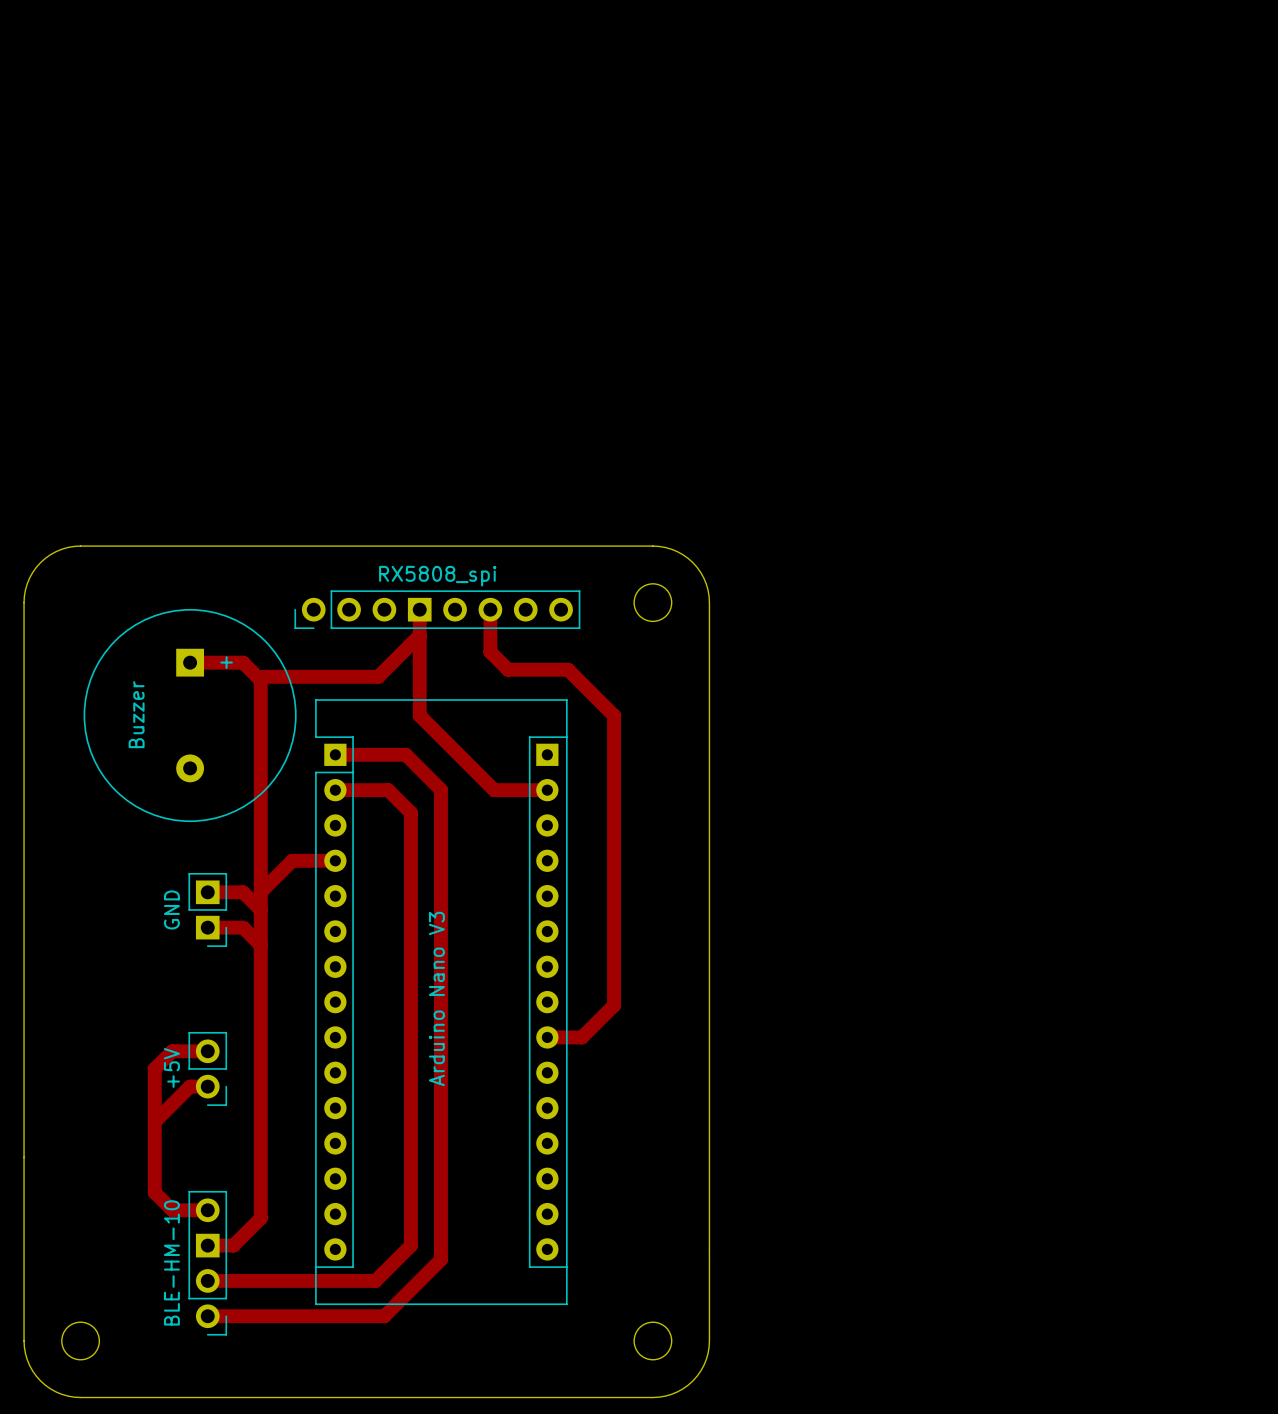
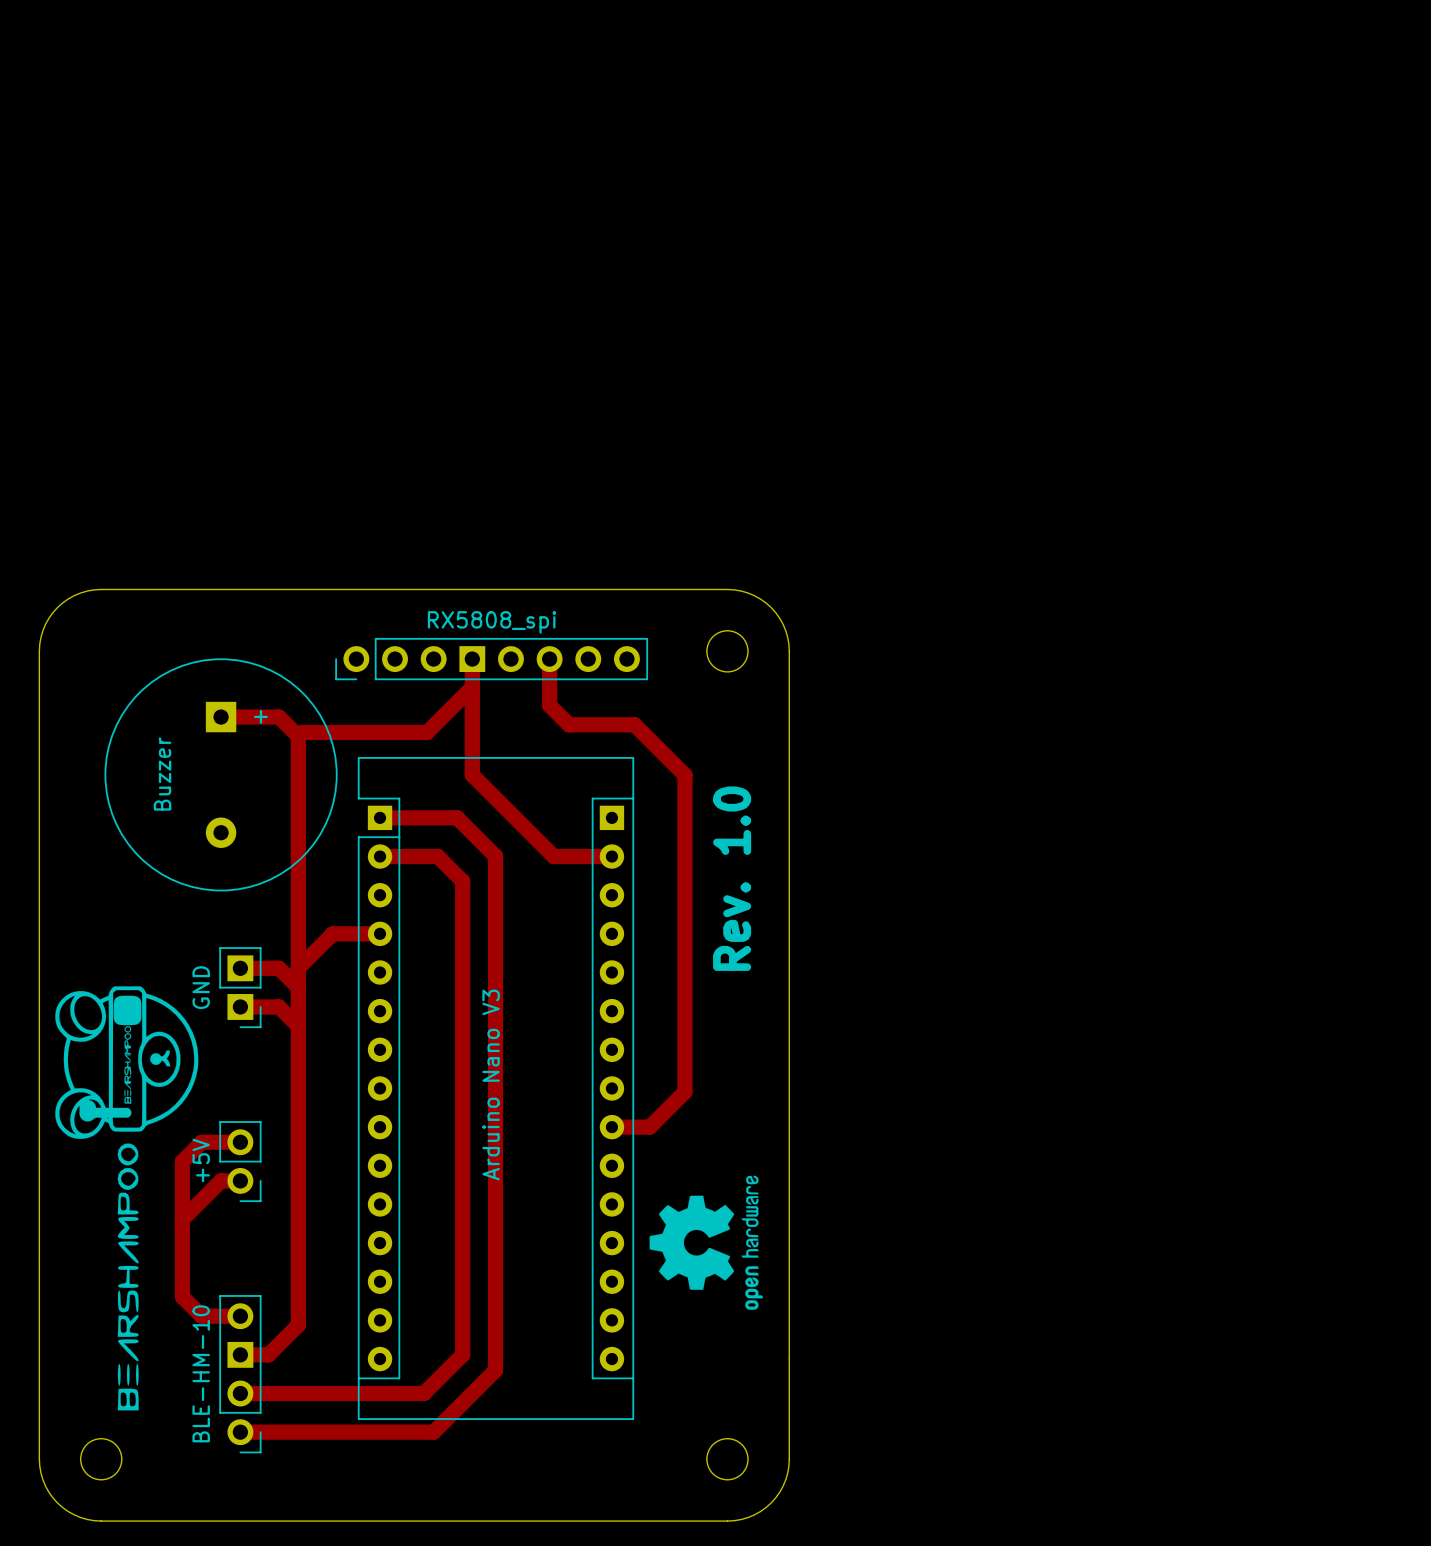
text: none -> Rev. 1.0 (732, 878)
drawing: none -> [55, 986, 199, 1411]
drawing: none -> [649, 1175, 764, 1310]

